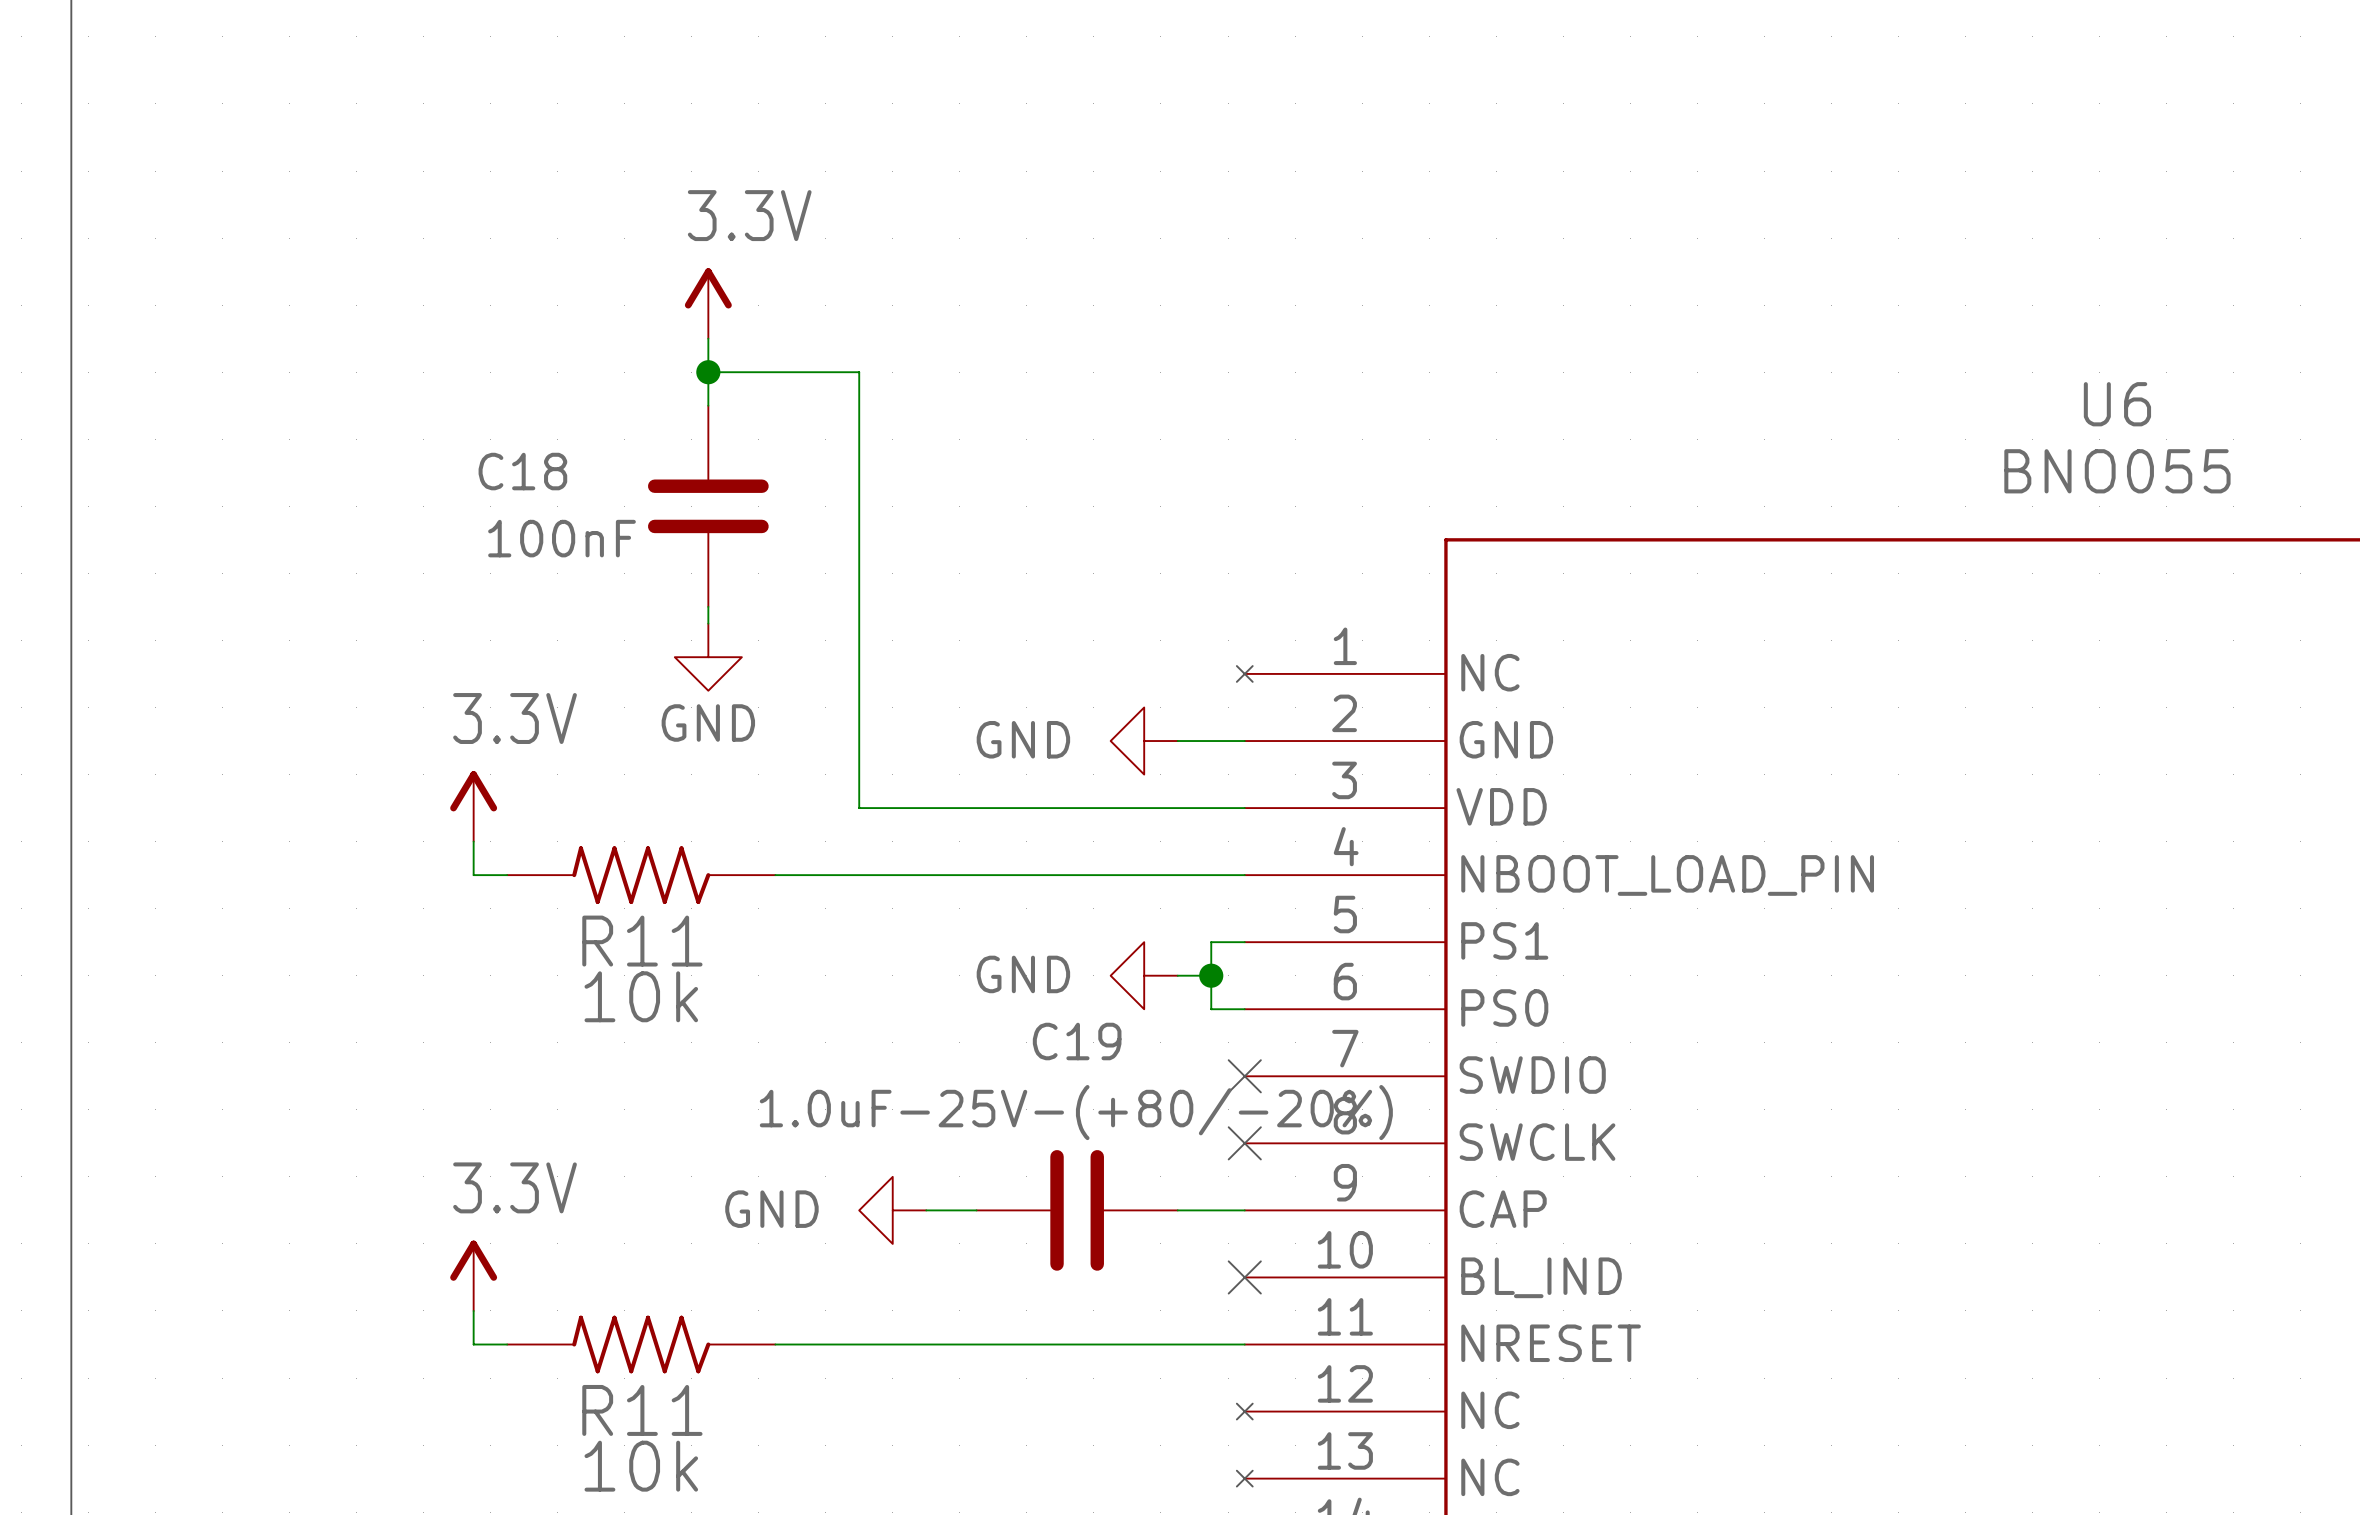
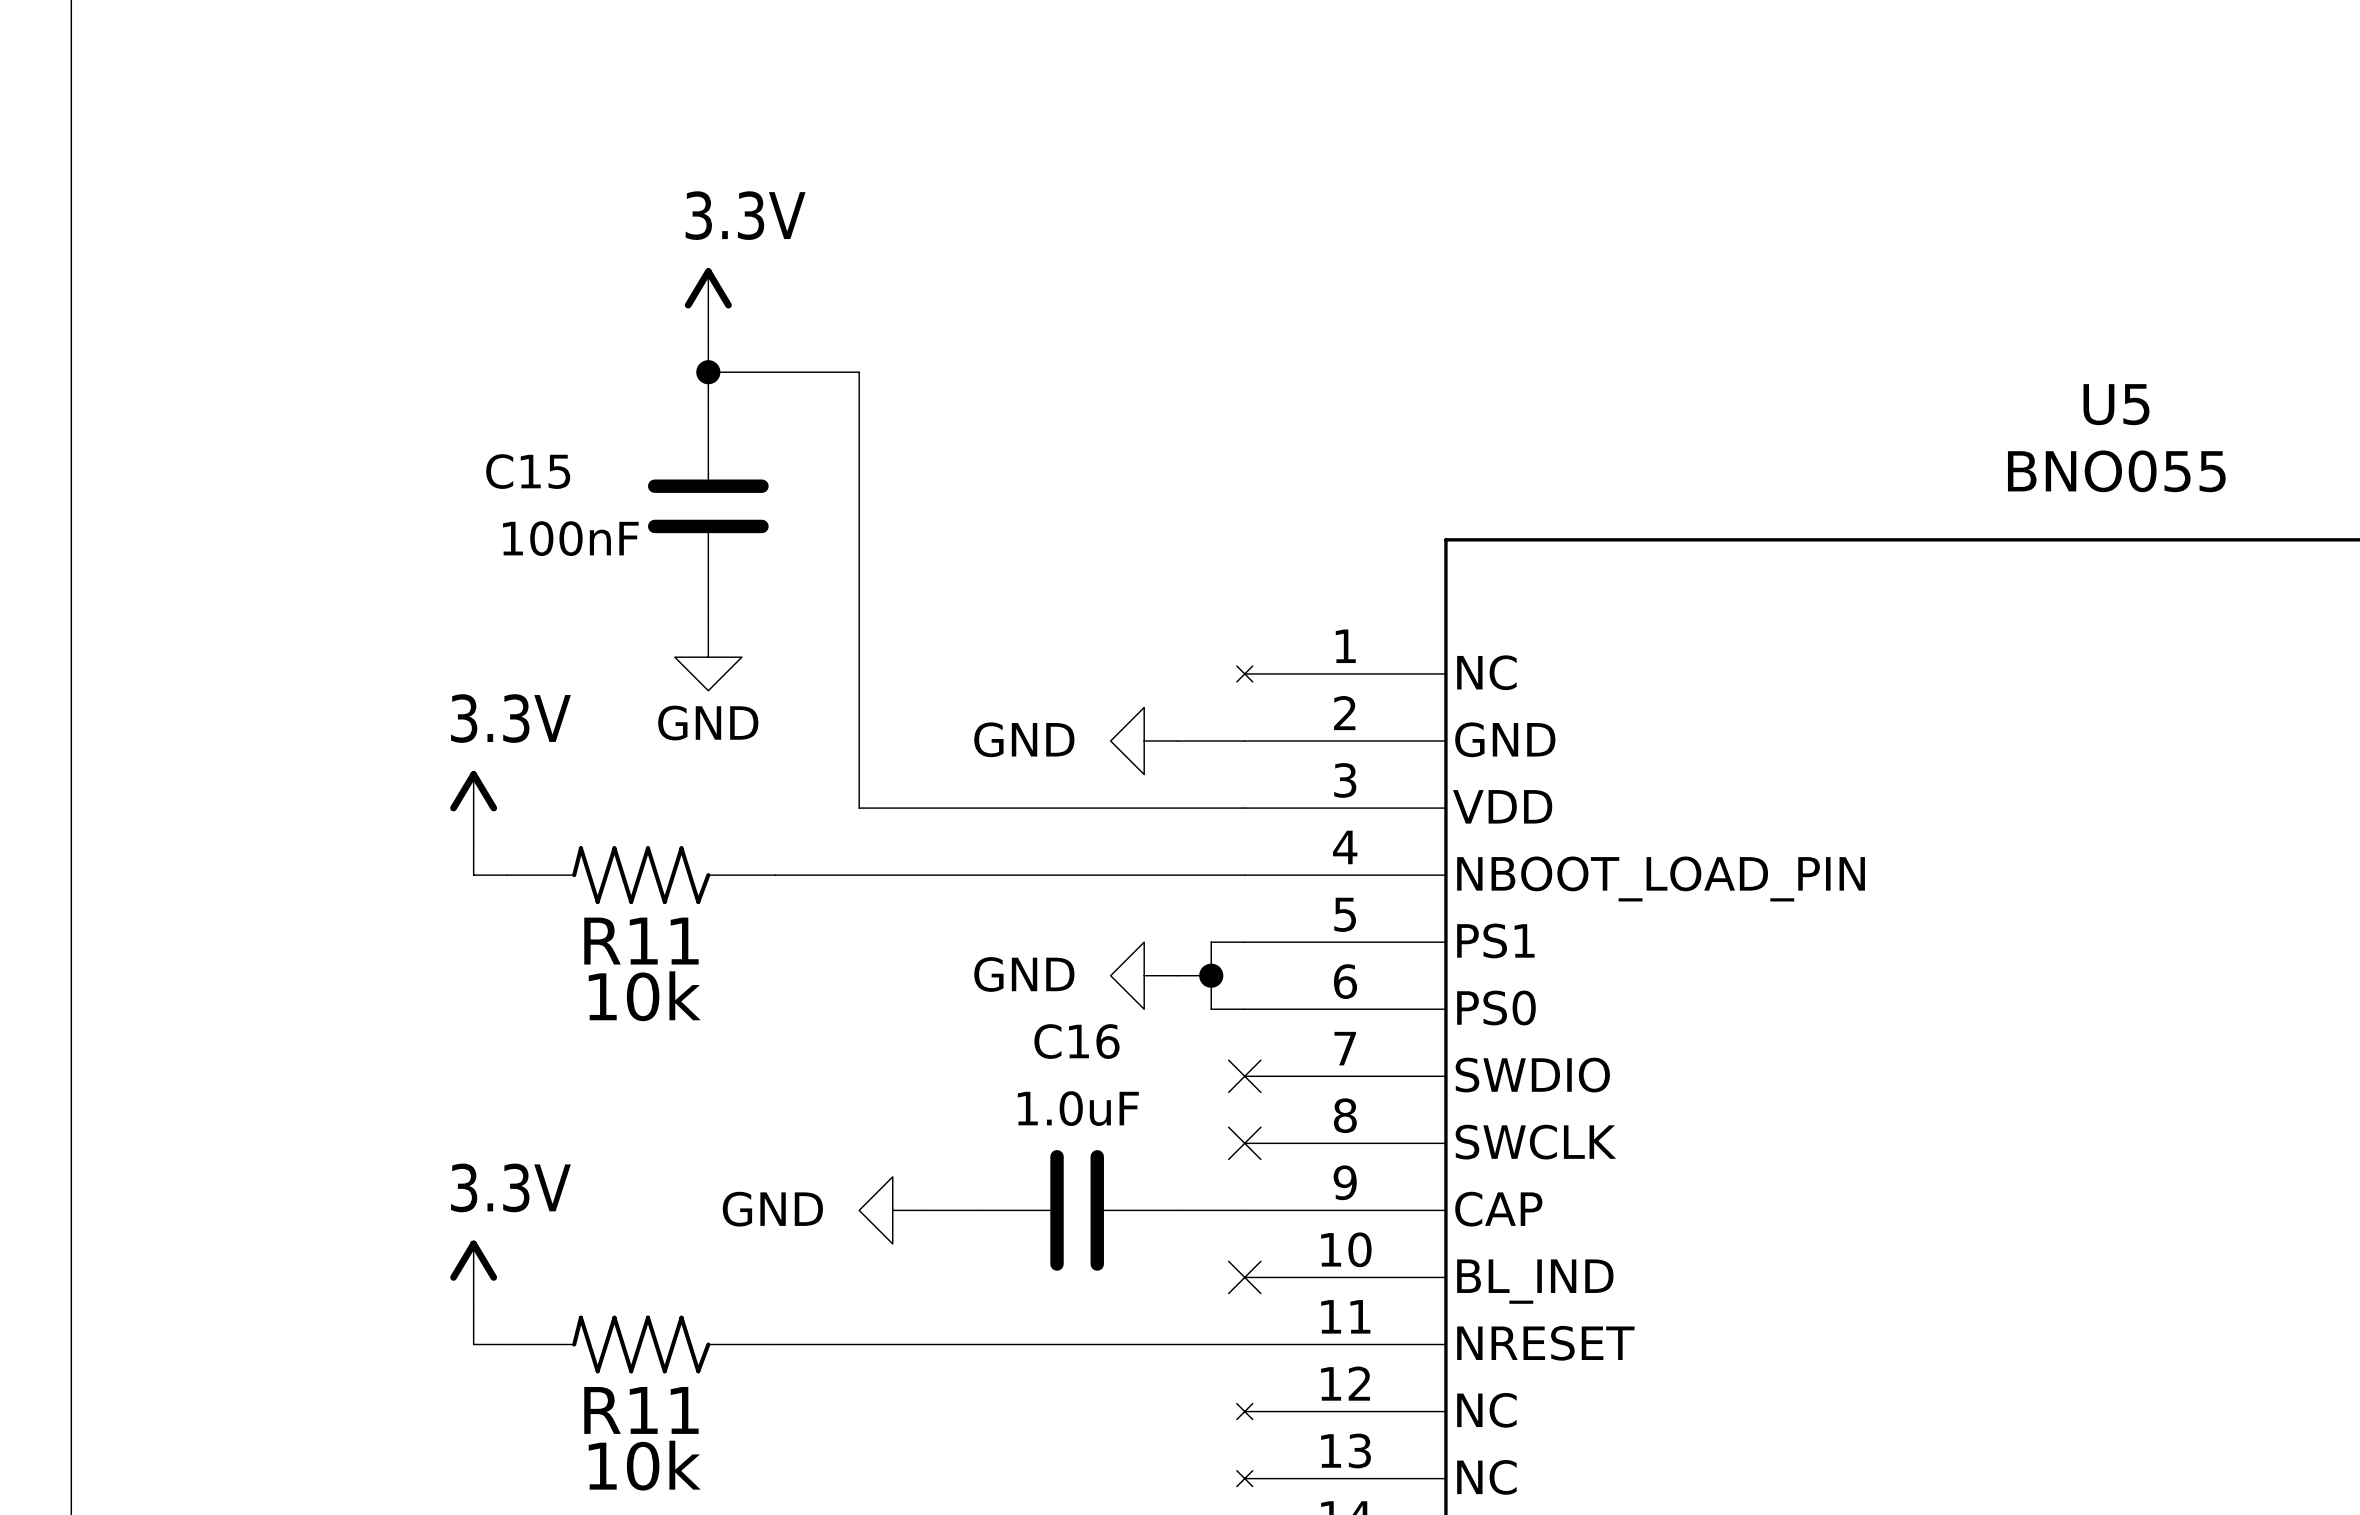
U6 name: U6 (2117, 404) -> U5 (2116, 404)
C18 name: C18 (522, 471) -> C15 (528, 471)
C19 name: C19 (1077, 1041) -> C16 (1076, 1041)
C19 value: 1.0uF-25V-(+80/-20%) (1076, 1112) -> 1.0uF (1078, 1108)

